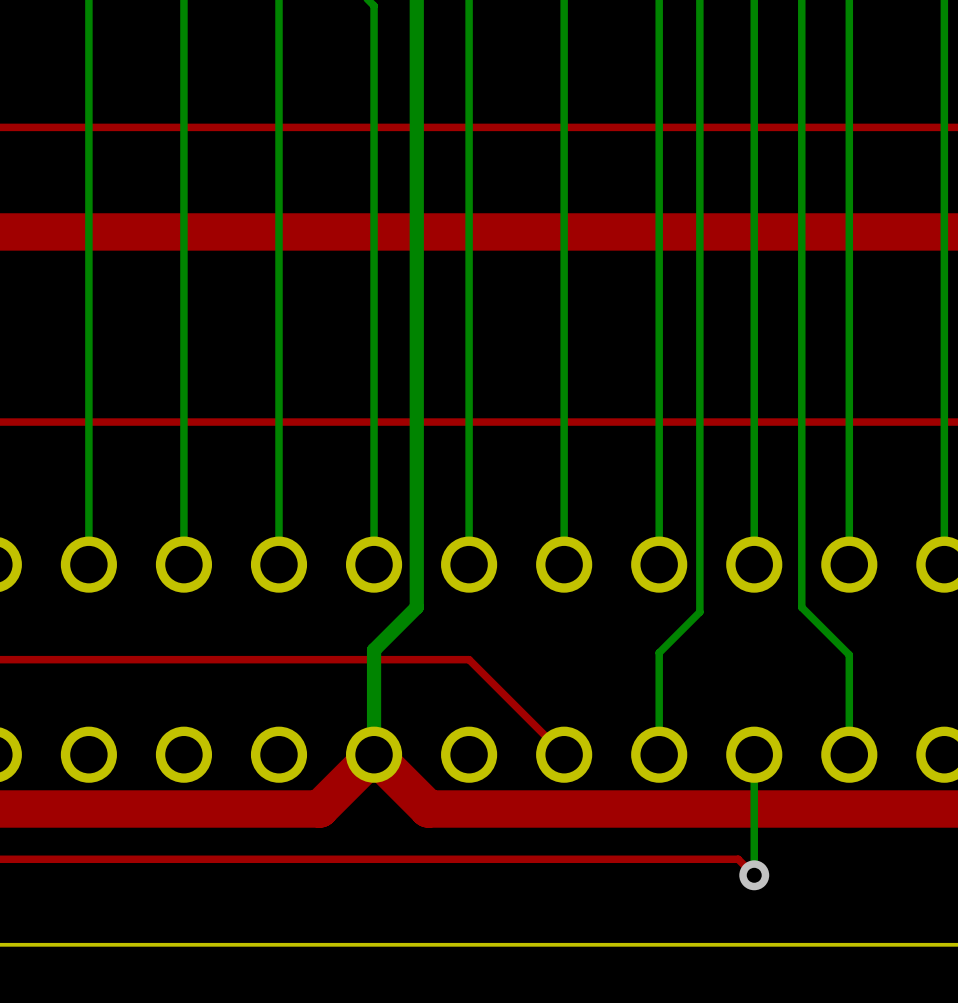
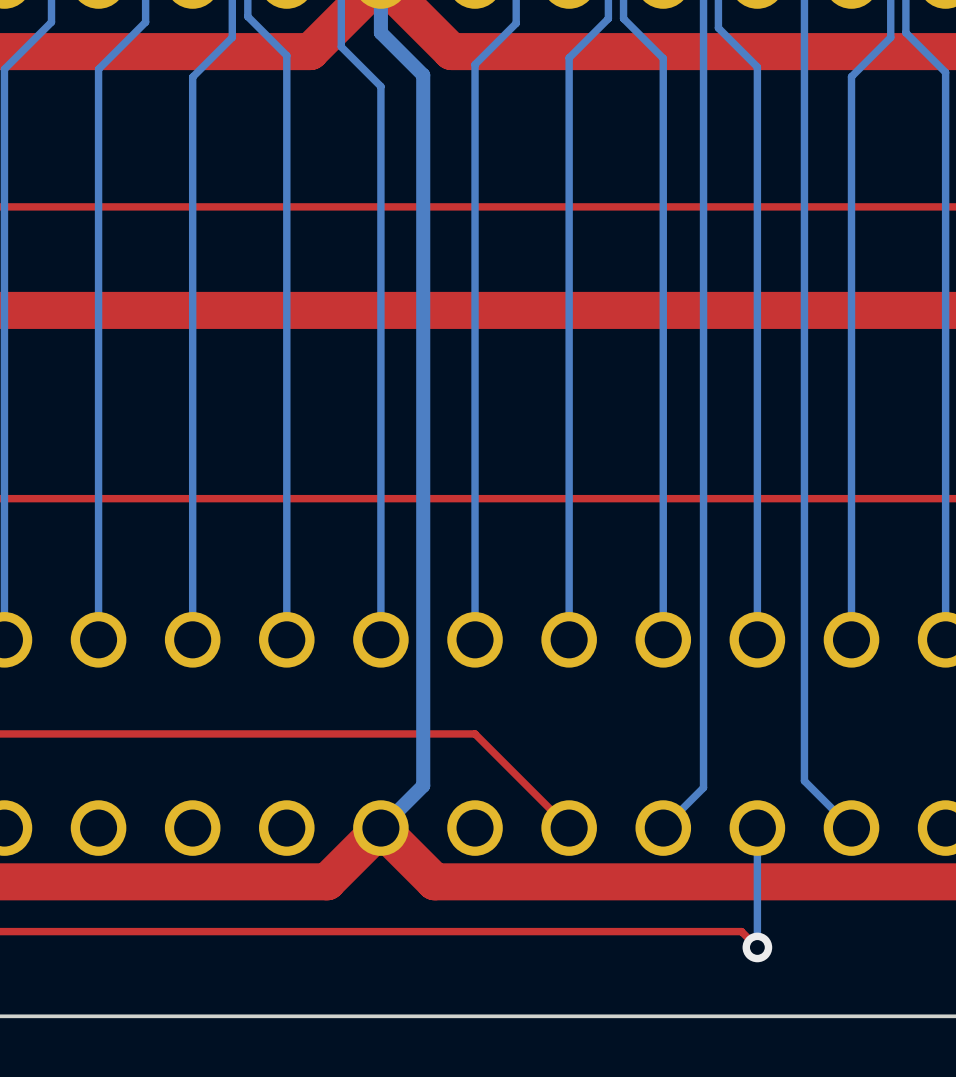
bottom track: (416, 607) (374, 650) (374, 754) -> (423, 682) (423, 785) (380, 828)
bottom track: (801, 607) (849, 654) (849, 754) -> (804, 682) (804, 781) (851, 828)
bottom track: (699, 612) (659, 652) (659, 754) -> (703, 686) (703, 787) (663, 828)

